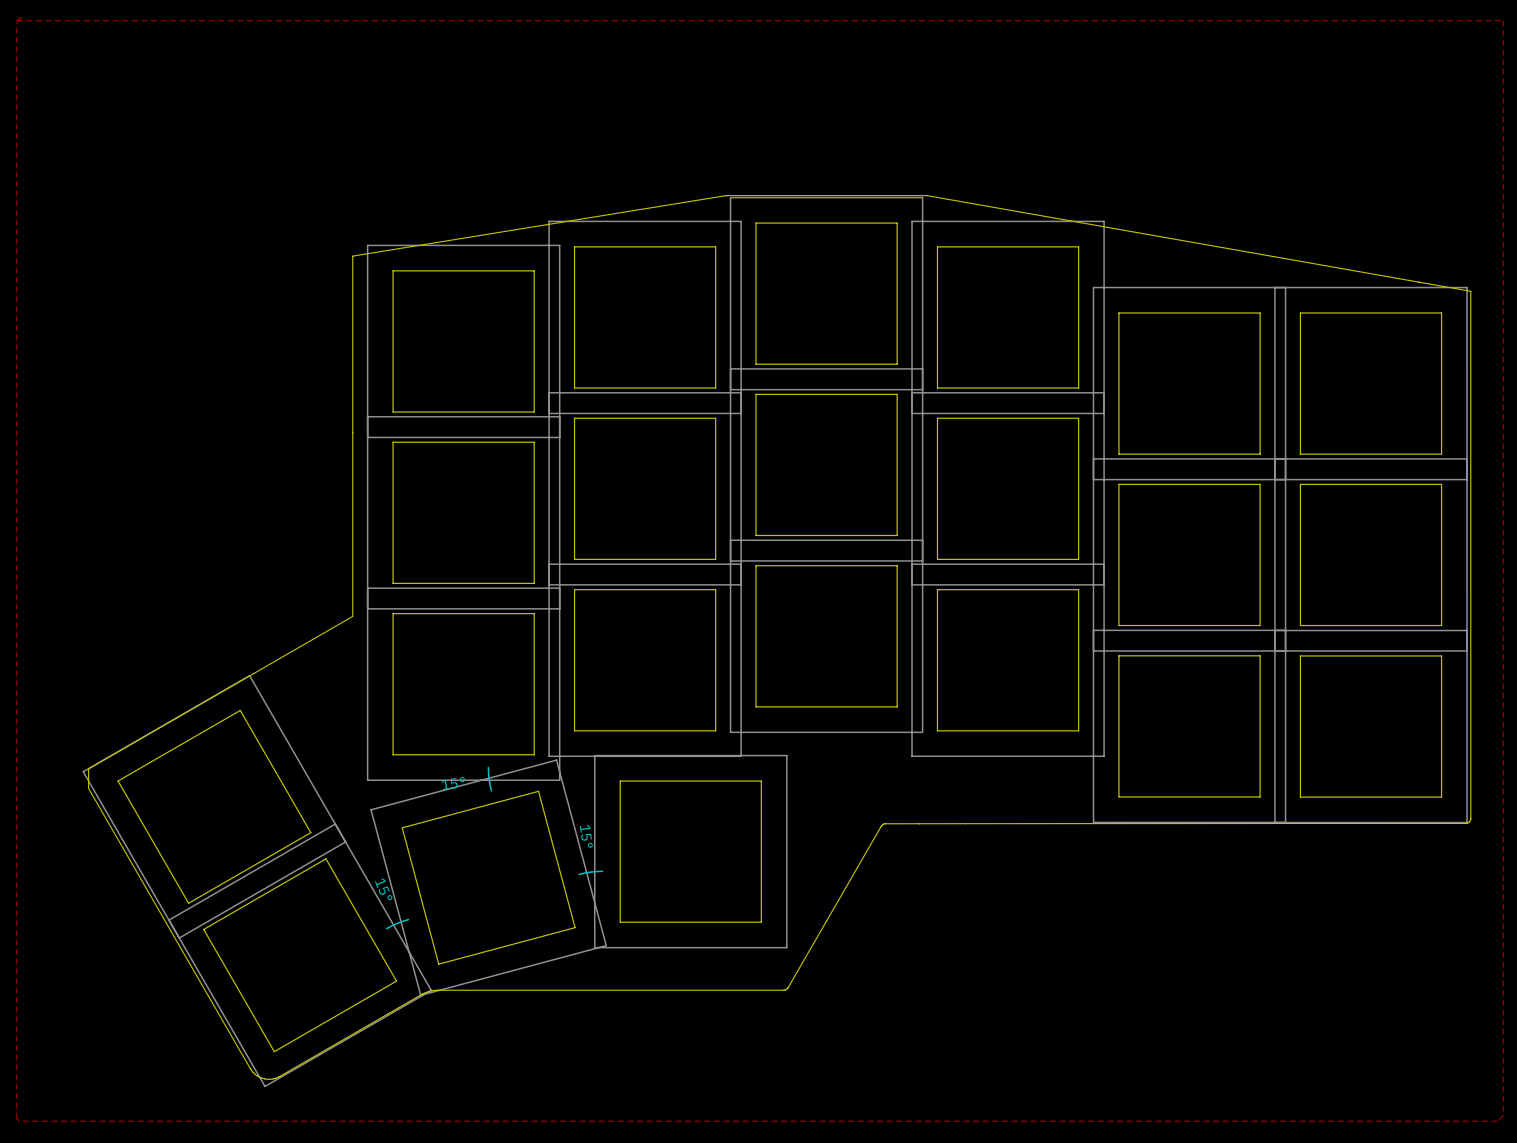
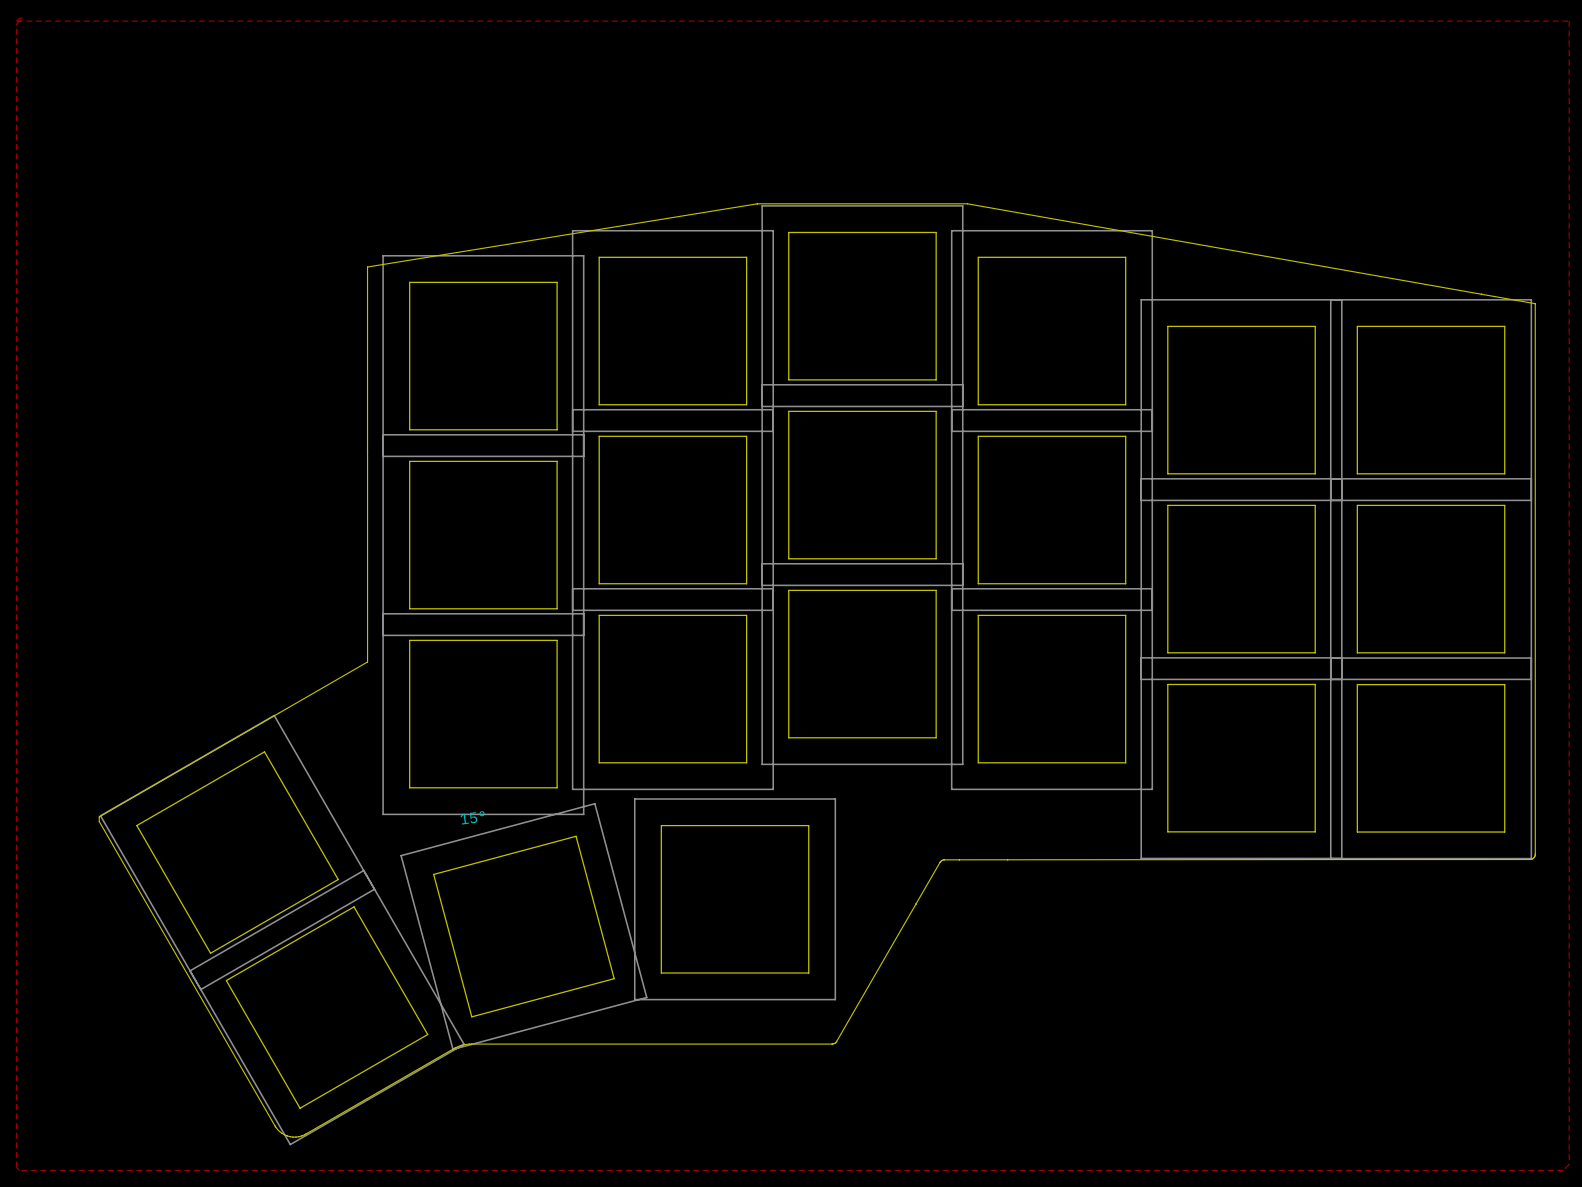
board edge: (352, 616) (88, 768) (88, 788) (250, 1069) (262, 1078) (270, 1079) (278, 1077) (422, 993) (432, 990) (785, 989) (881, 825) (884, 823) (905, 823) -> (367, 643) (367, 661) (99, 816) (99, 821) (274, 1125) (287, 1135) (296, 1137) (304, 1134) (453, 1048) (465, 1044) (834, 1043) (939, 862) (944, 859)
line: (488, 767) (491, 790) -> none
drawing position: (214, 806) -> (237, 852)
text: 15° (586, 836) -> none
drawing position: (690, 851) -> (735, 899)
line: (602, 871) (579, 874) -> none
drawing position: (488, 877) -> (523, 926)
text: 15° (383, 889) -> none
line: (408, 919) (386, 928) -> none
drawing position: (300, 955) -> (327, 1007)

